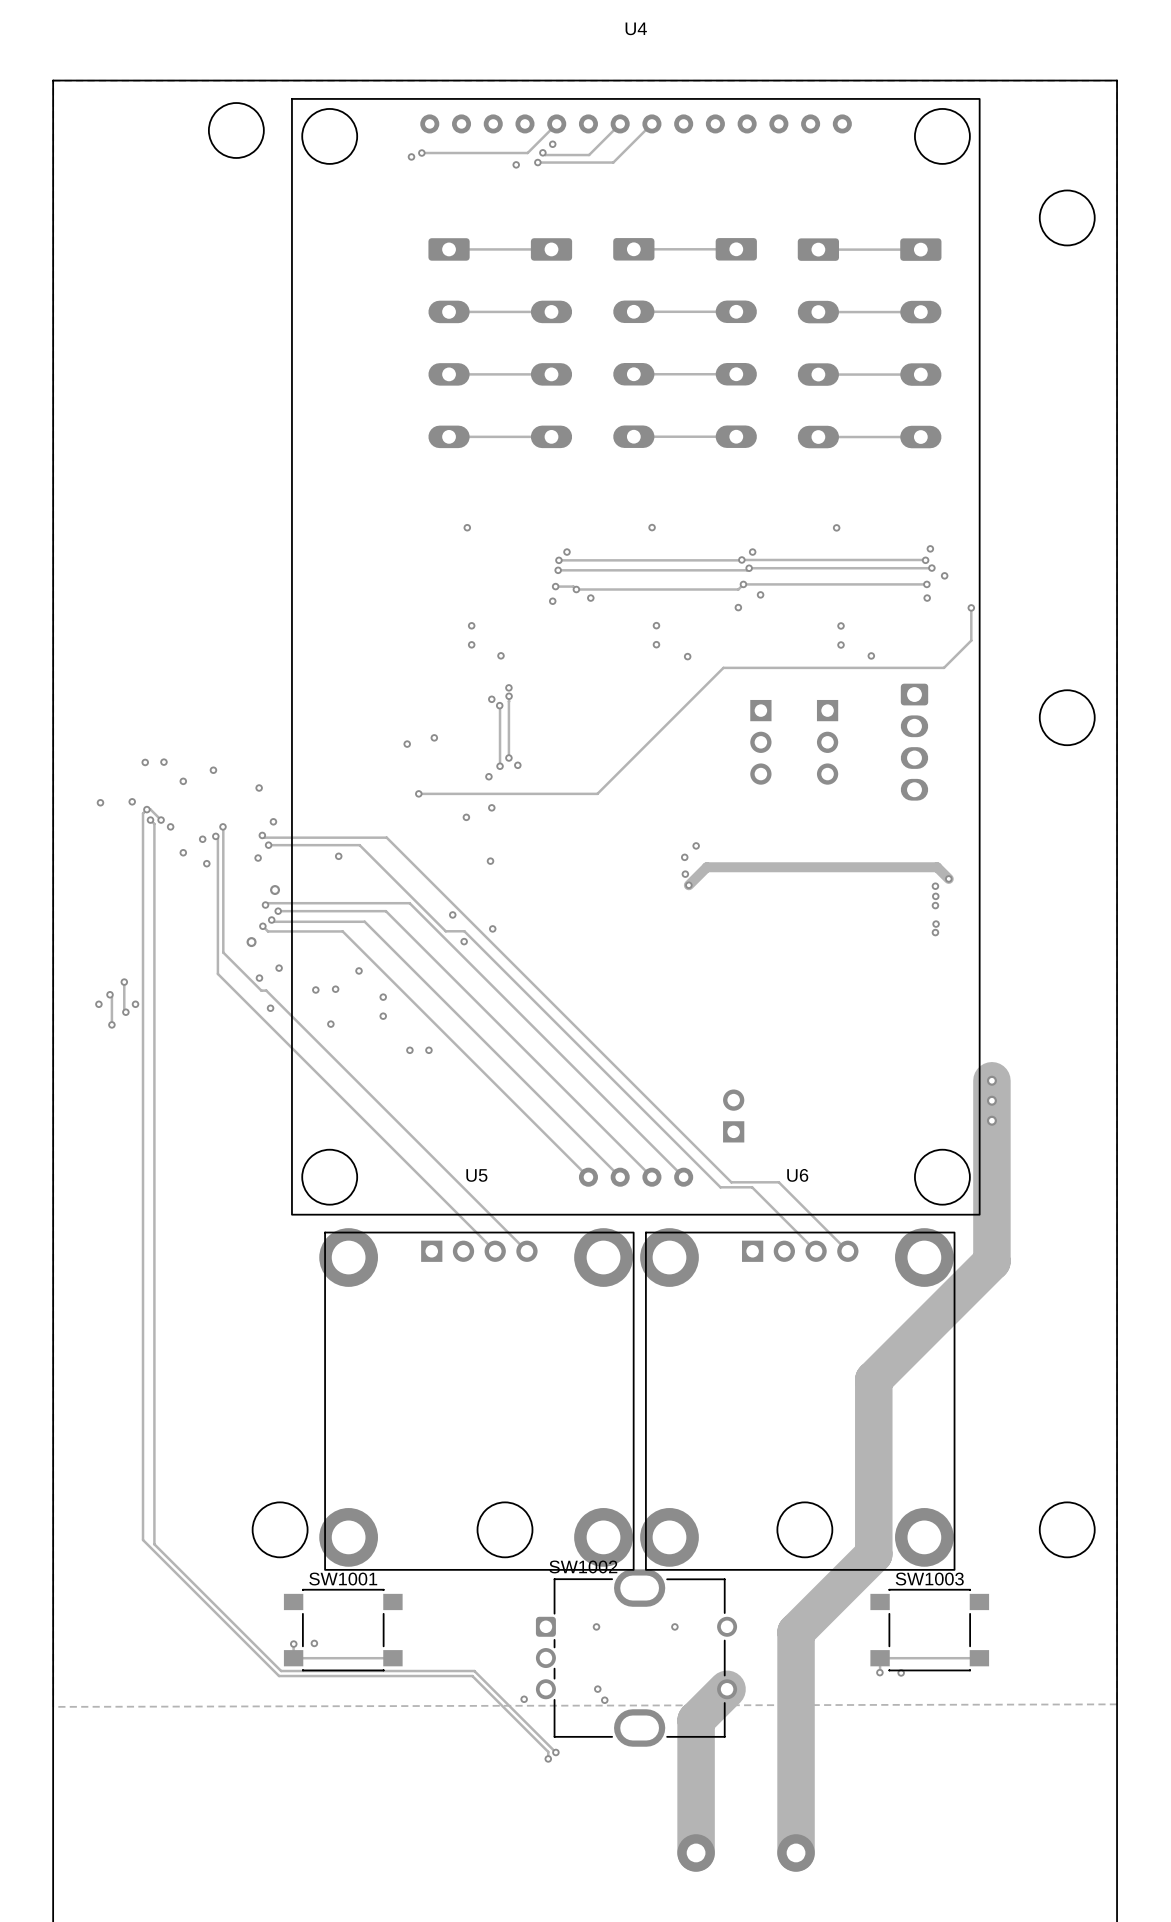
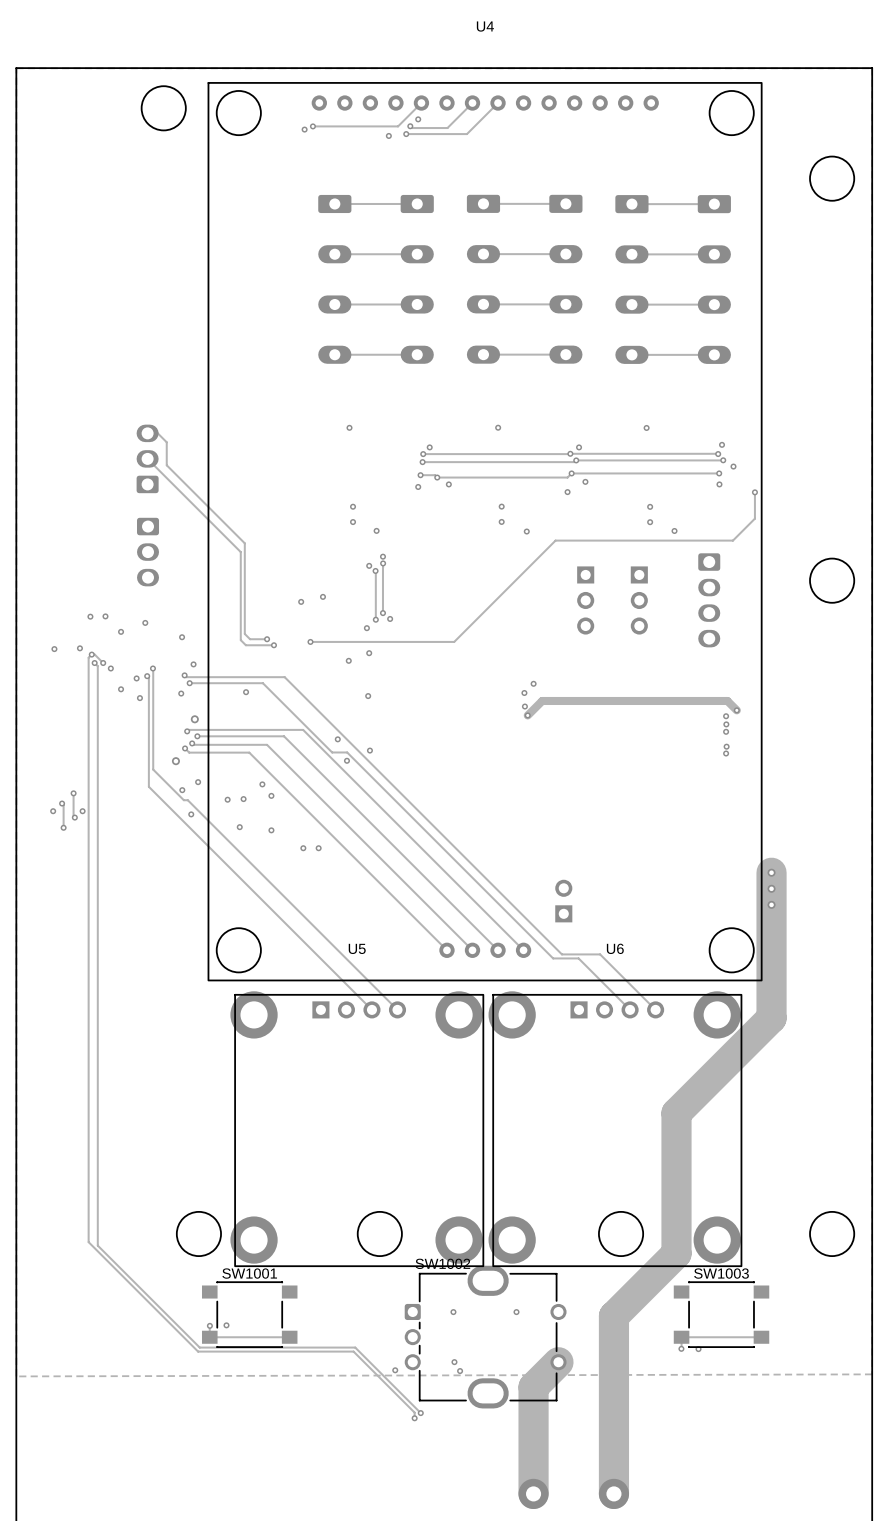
track: none -> (147, 433) (157, 433) (166, 442) (166, 465) (244, 543) (244, 633) (250, 639) (267, 639)
track: none -> (147, 458) (240, 552) (240, 640) (245, 645) (273, 645)
part: none -> (147, 458)
part: none -> (148, 552)
via: none -> (267, 639)
via: none -> (273, 645)
via: none -> (271, 795)
via: (383, 997) -> none
via: (383, 1016) -> none
via: none -> (271, 830)

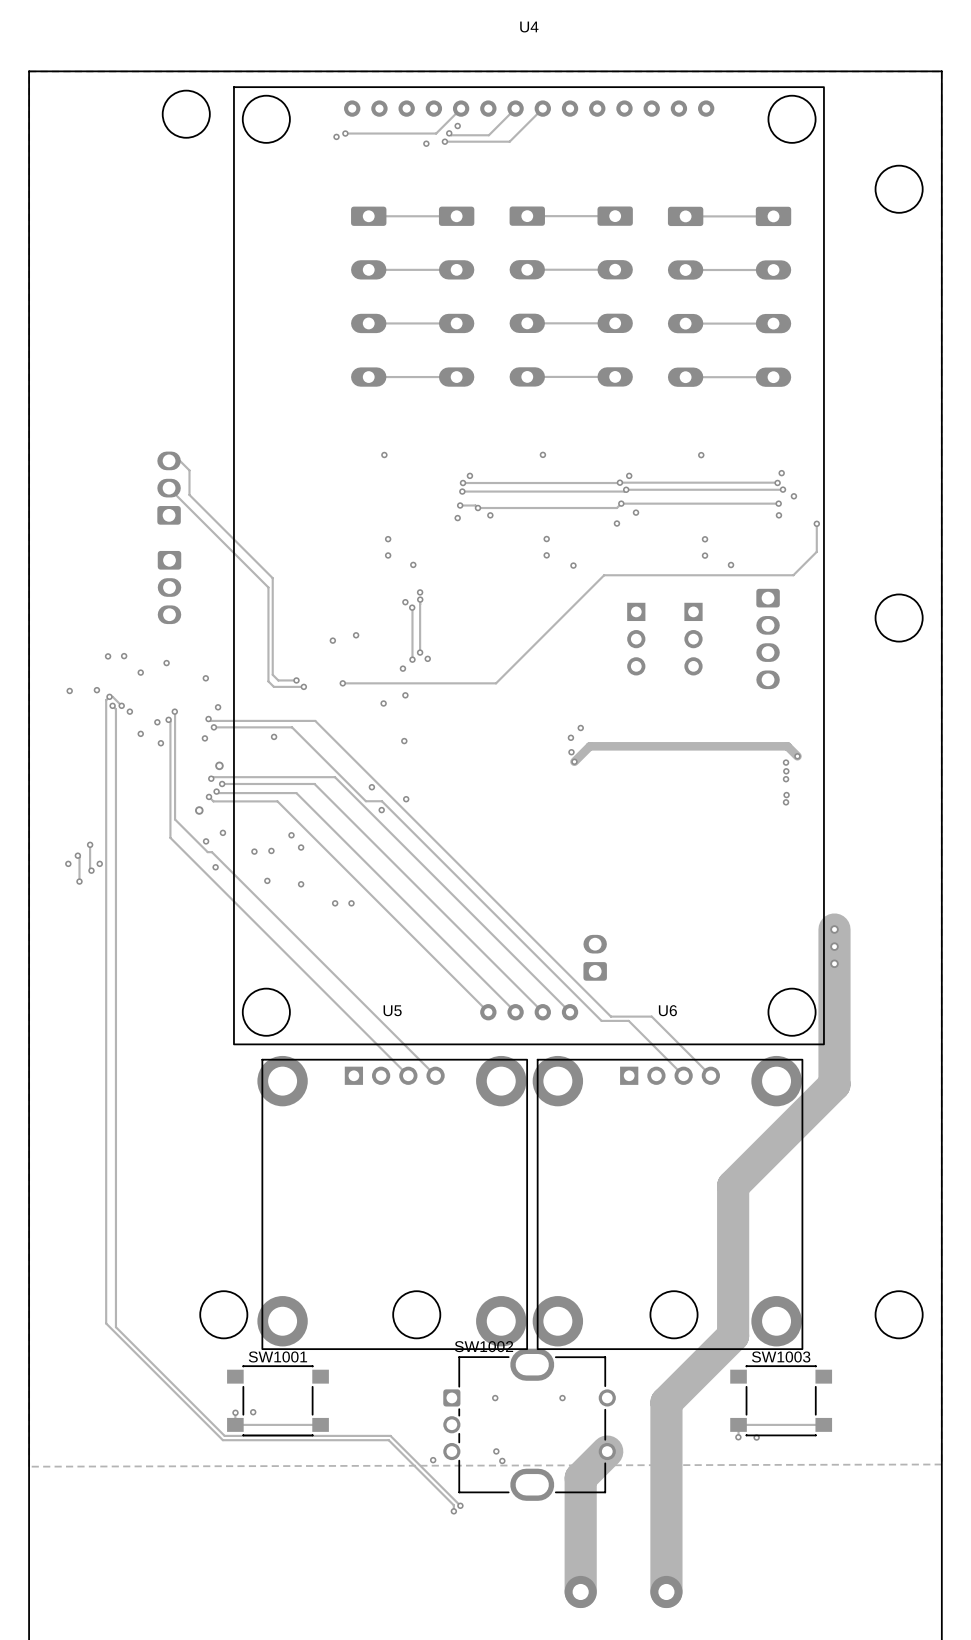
part: none -> (595, 957)
part: (563, 901) -> none

